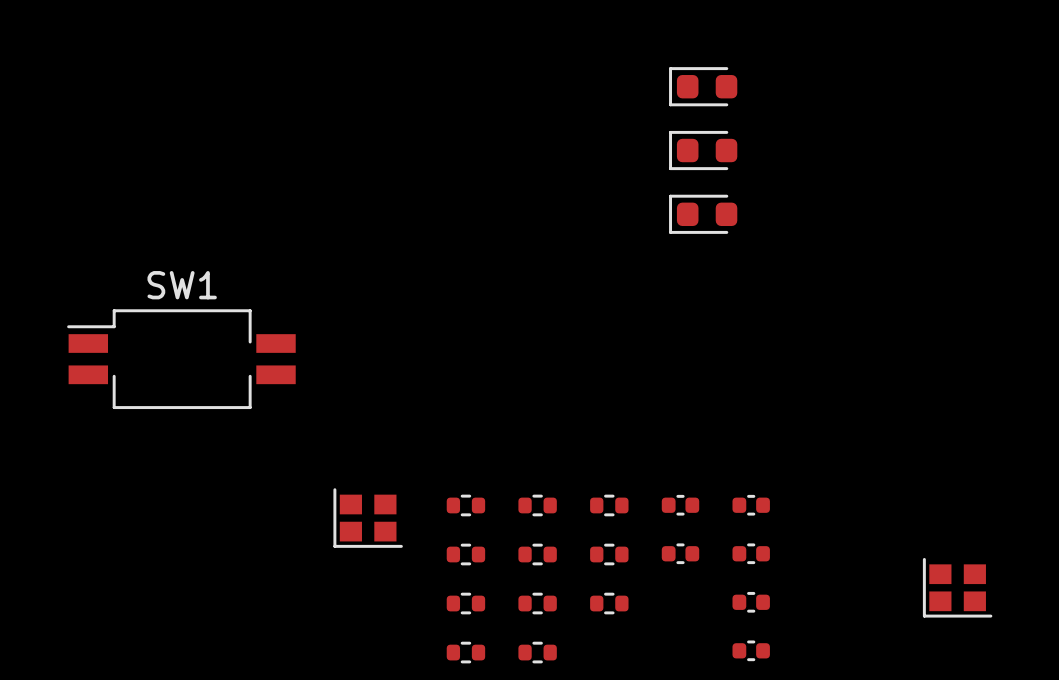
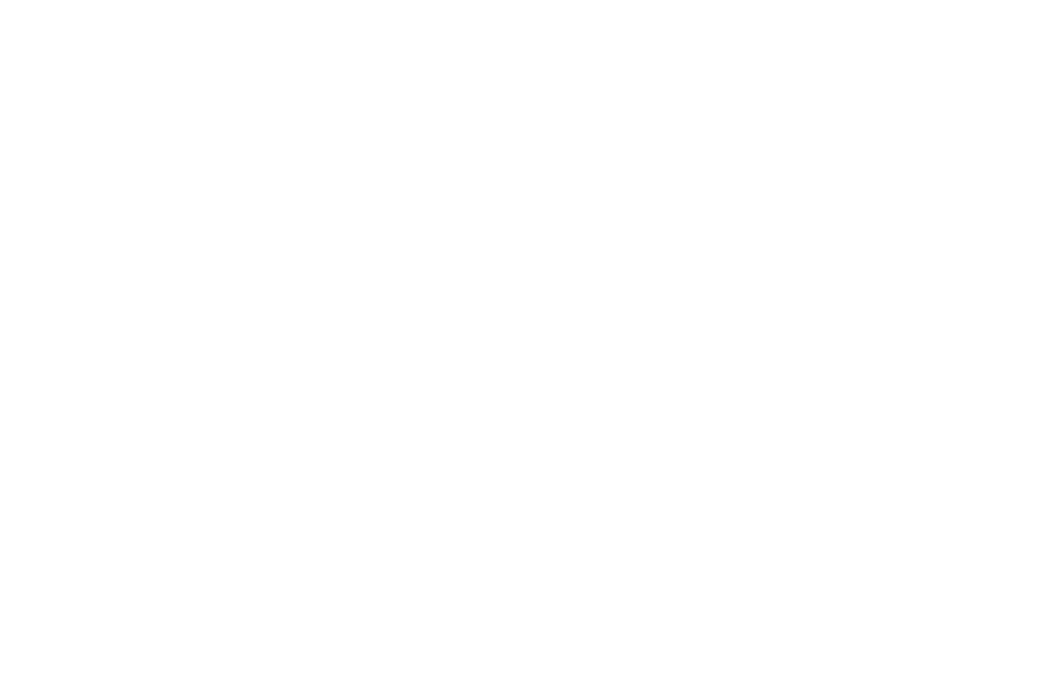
part: (703, 86) -> none
part: (703, 150) -> none
part: (703, 214) -> none
SW1: (181, 359) -> none
part: (465, 505) -> none
part: (537, 505) -> none
part: (609, 505) -> none
part: (680, 505) -> none
part: (751, 505) -> none
part: (368, 518) -> none
part: (680, 553) -> none
part: (751, 553) -> none
part: (465, 554) -> none
part: (537, 554) -> none
part: (609, 554) -> none
part: (957, 587) -> none
part: (751, 602) -> none
part: (465, 603) -> none
part: (537, 603) -> none
part: (609, 603) -> none
part: (751, 650) -> none
part: (465, 652) -> none
part: (537, 652) -> none

